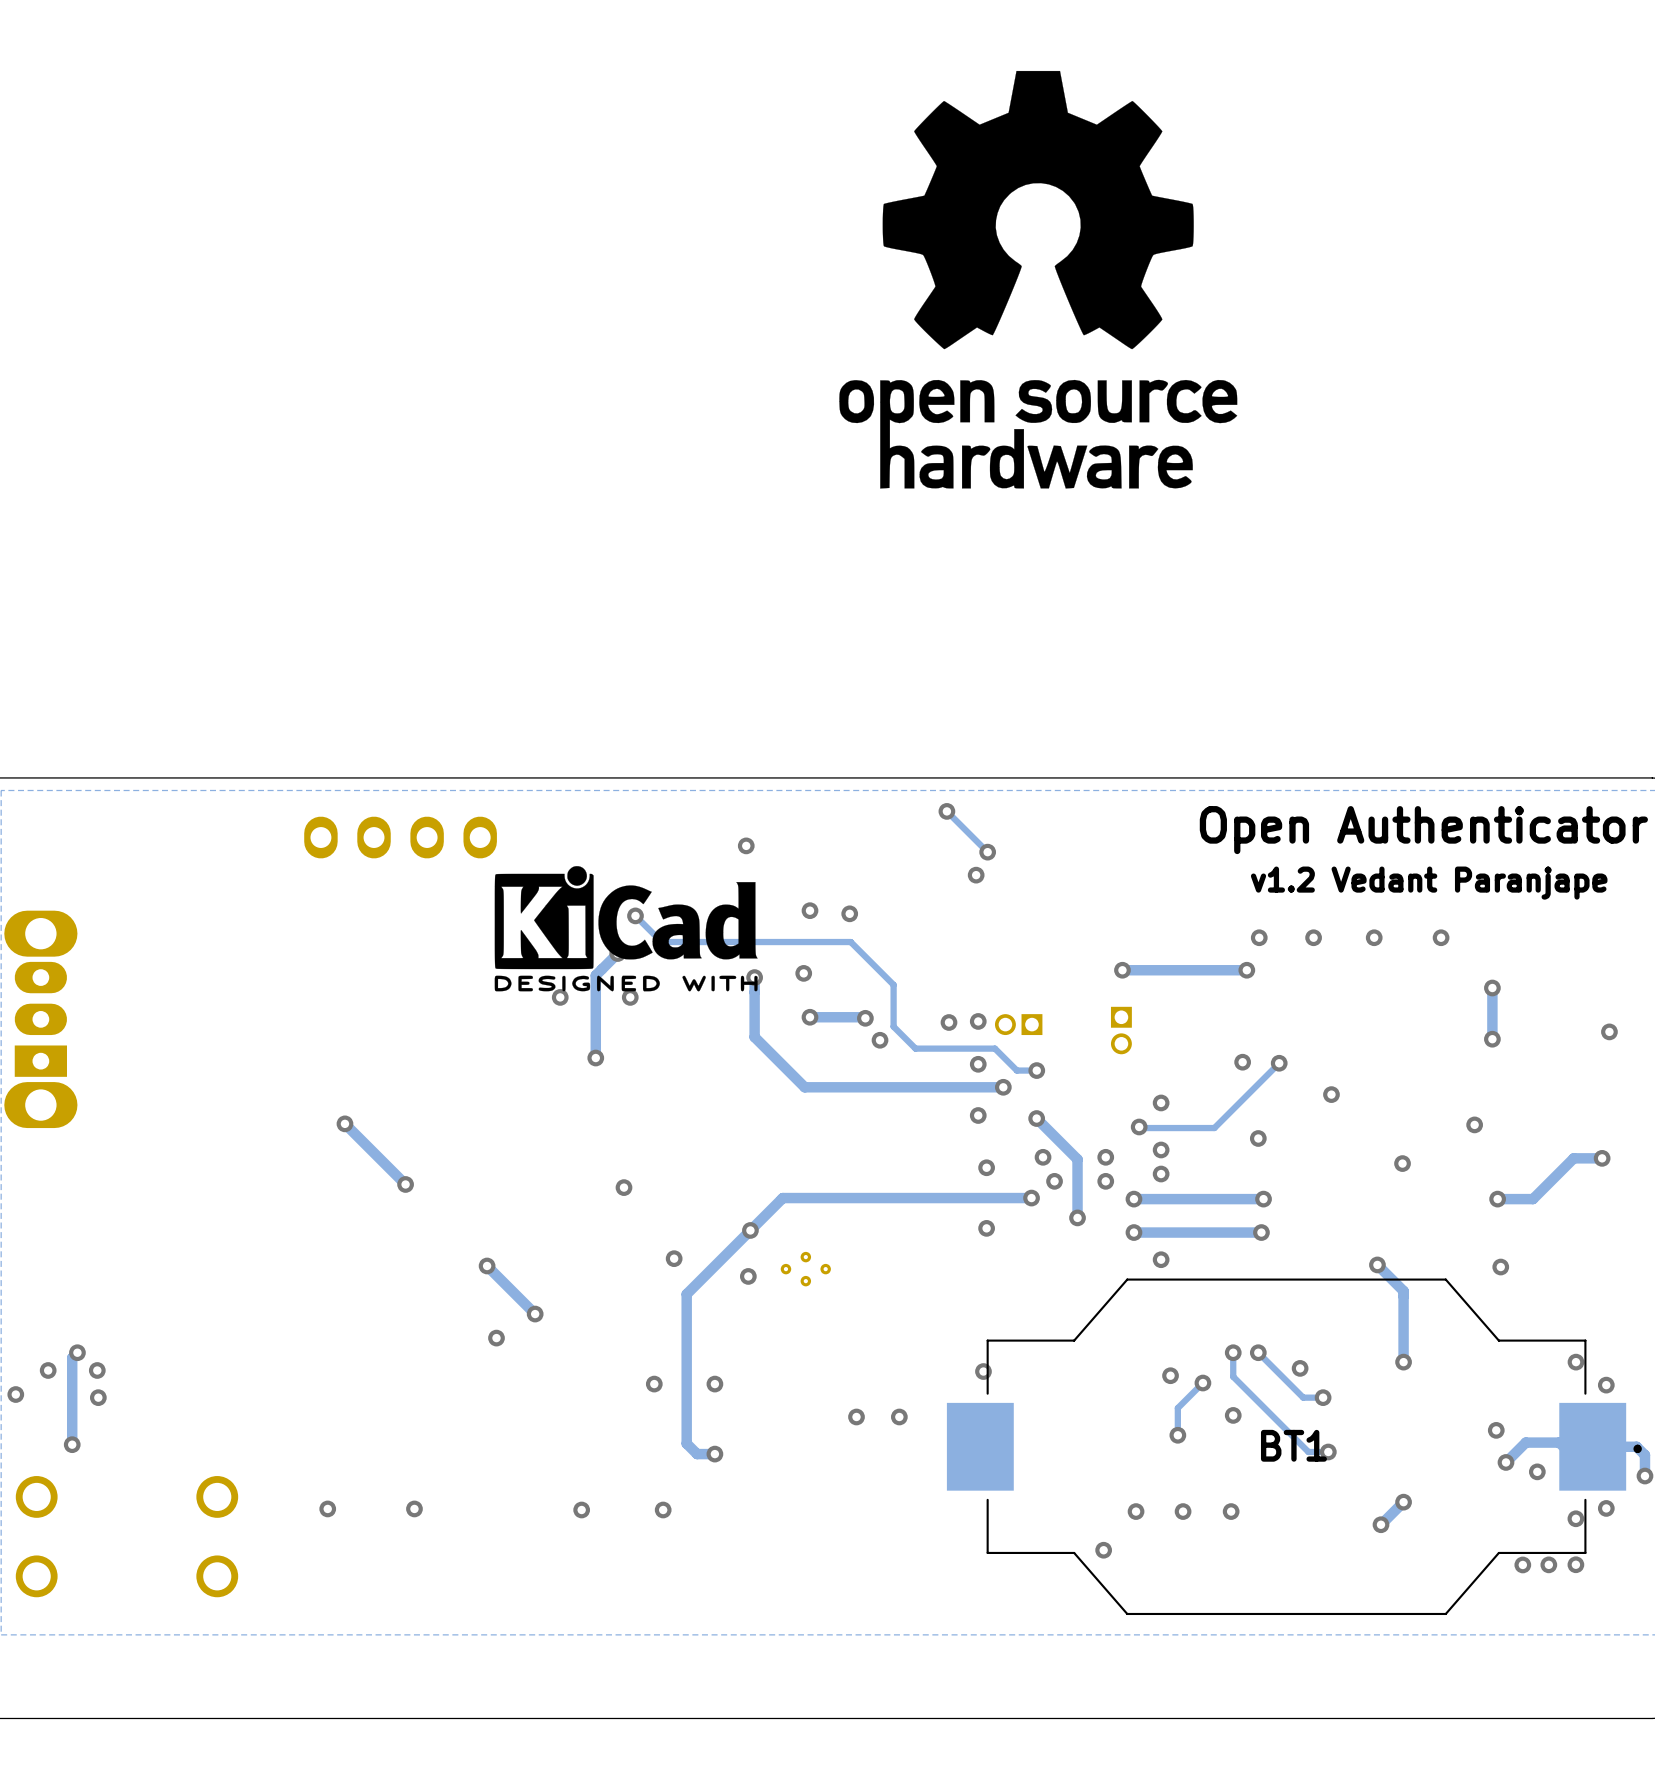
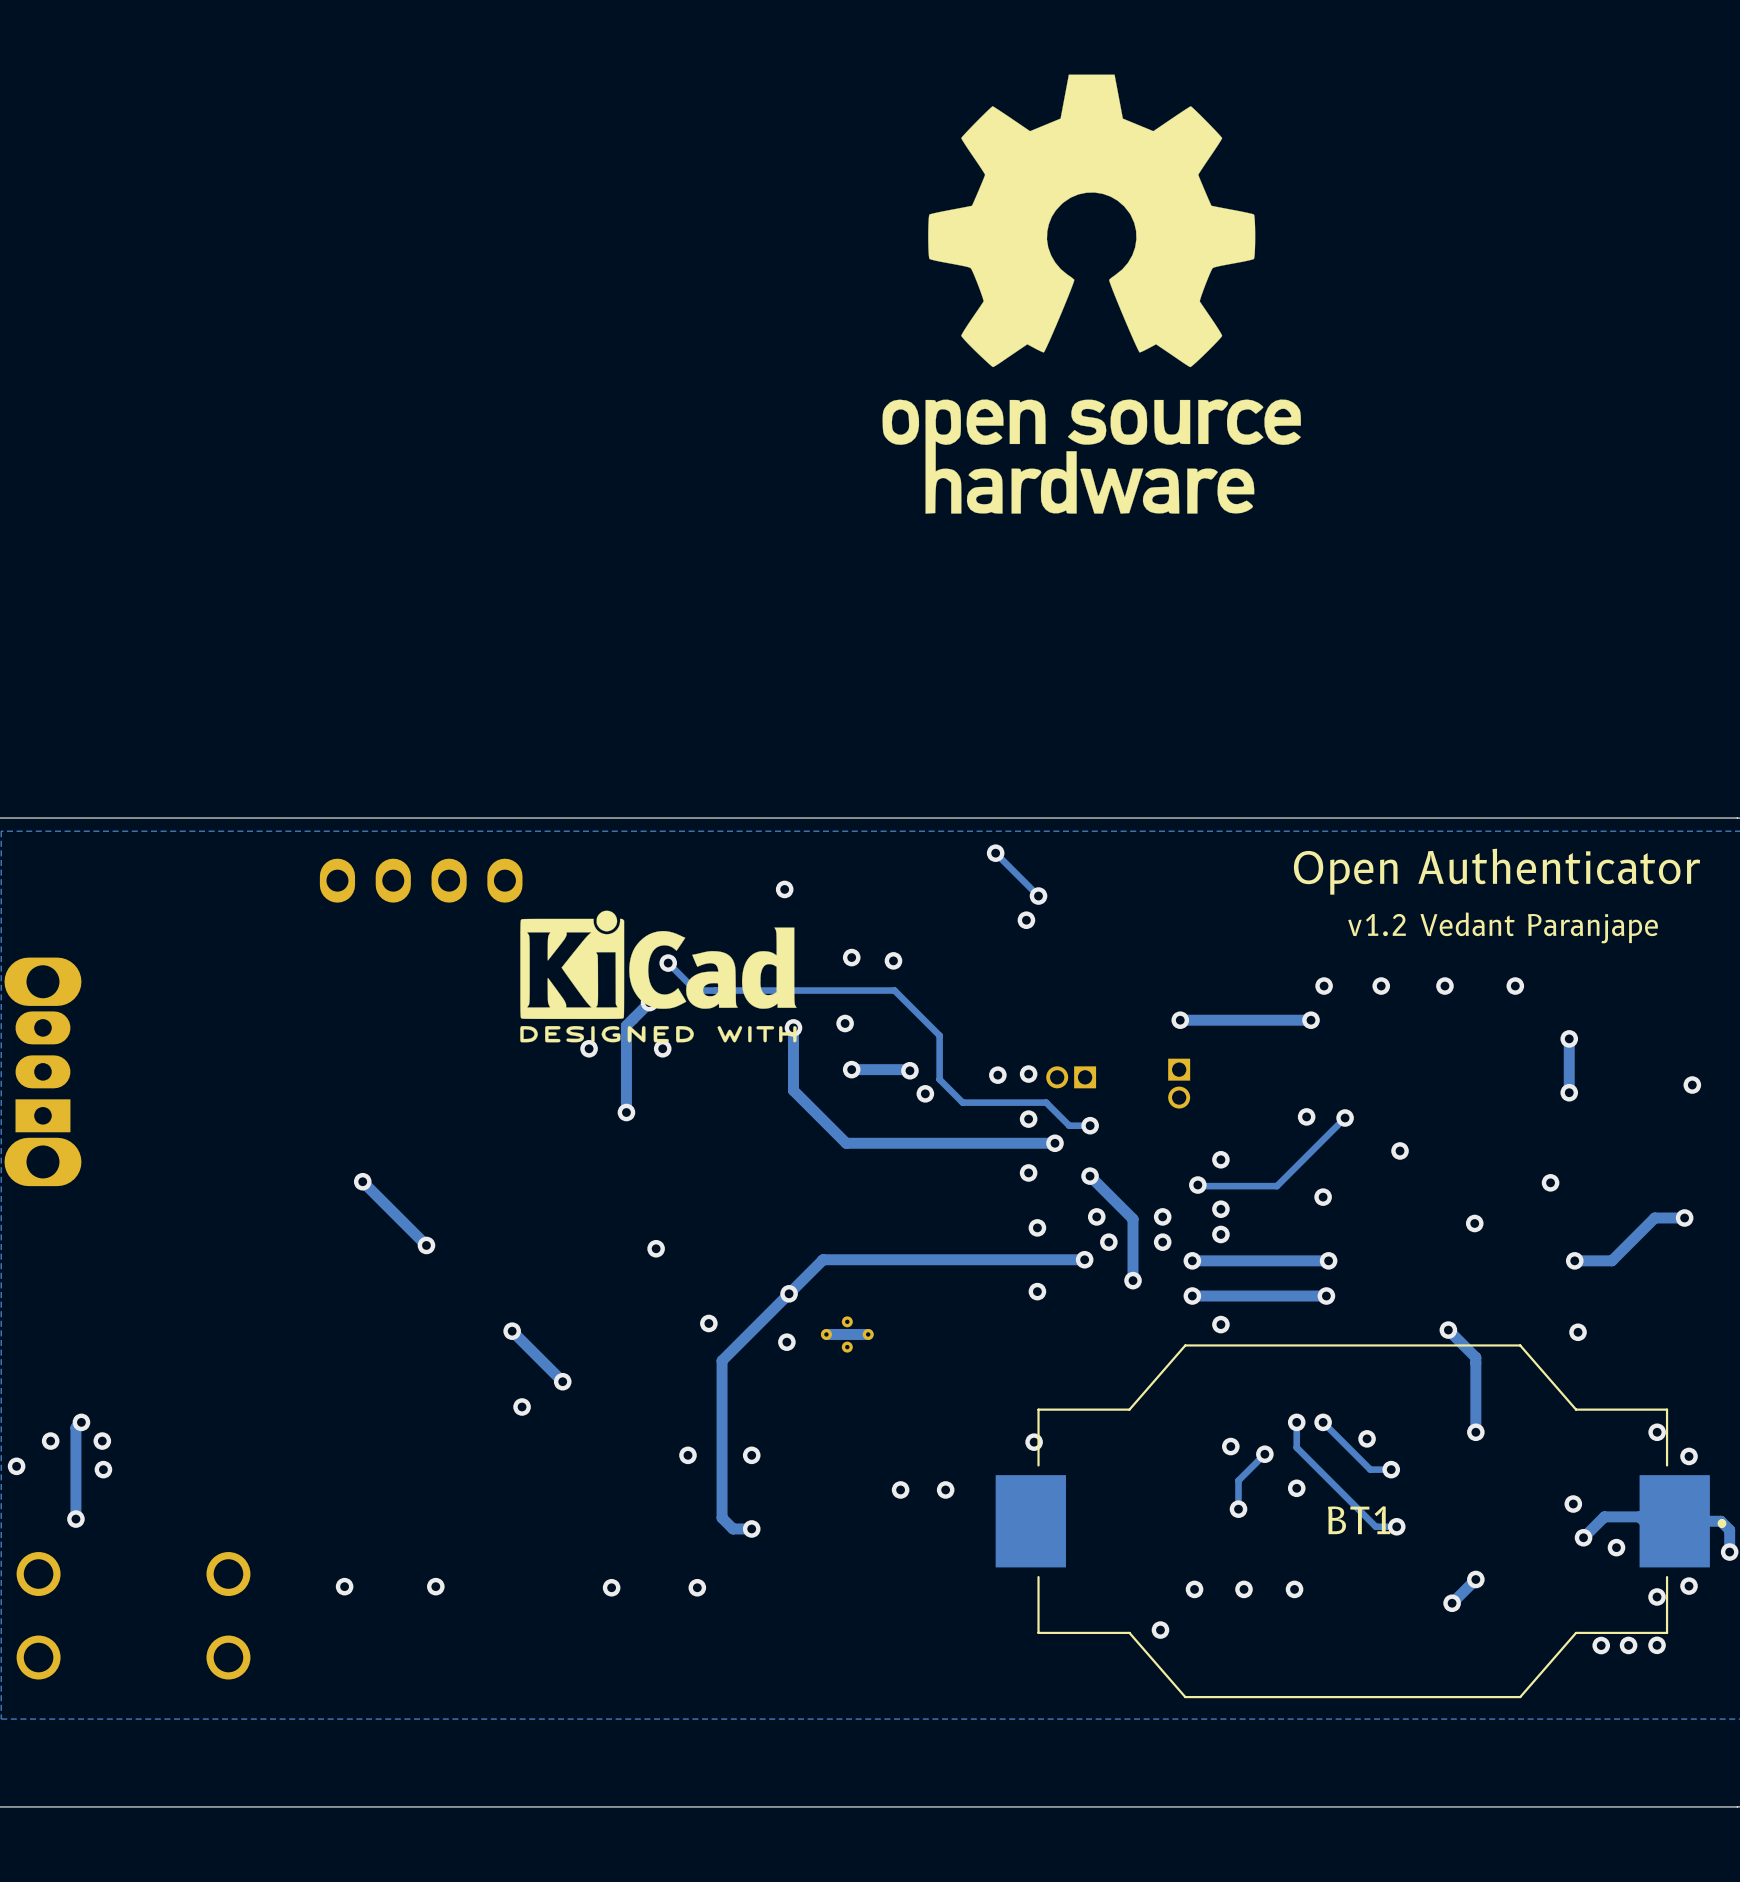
track: none -> (868, 1334) (826, 1334)

